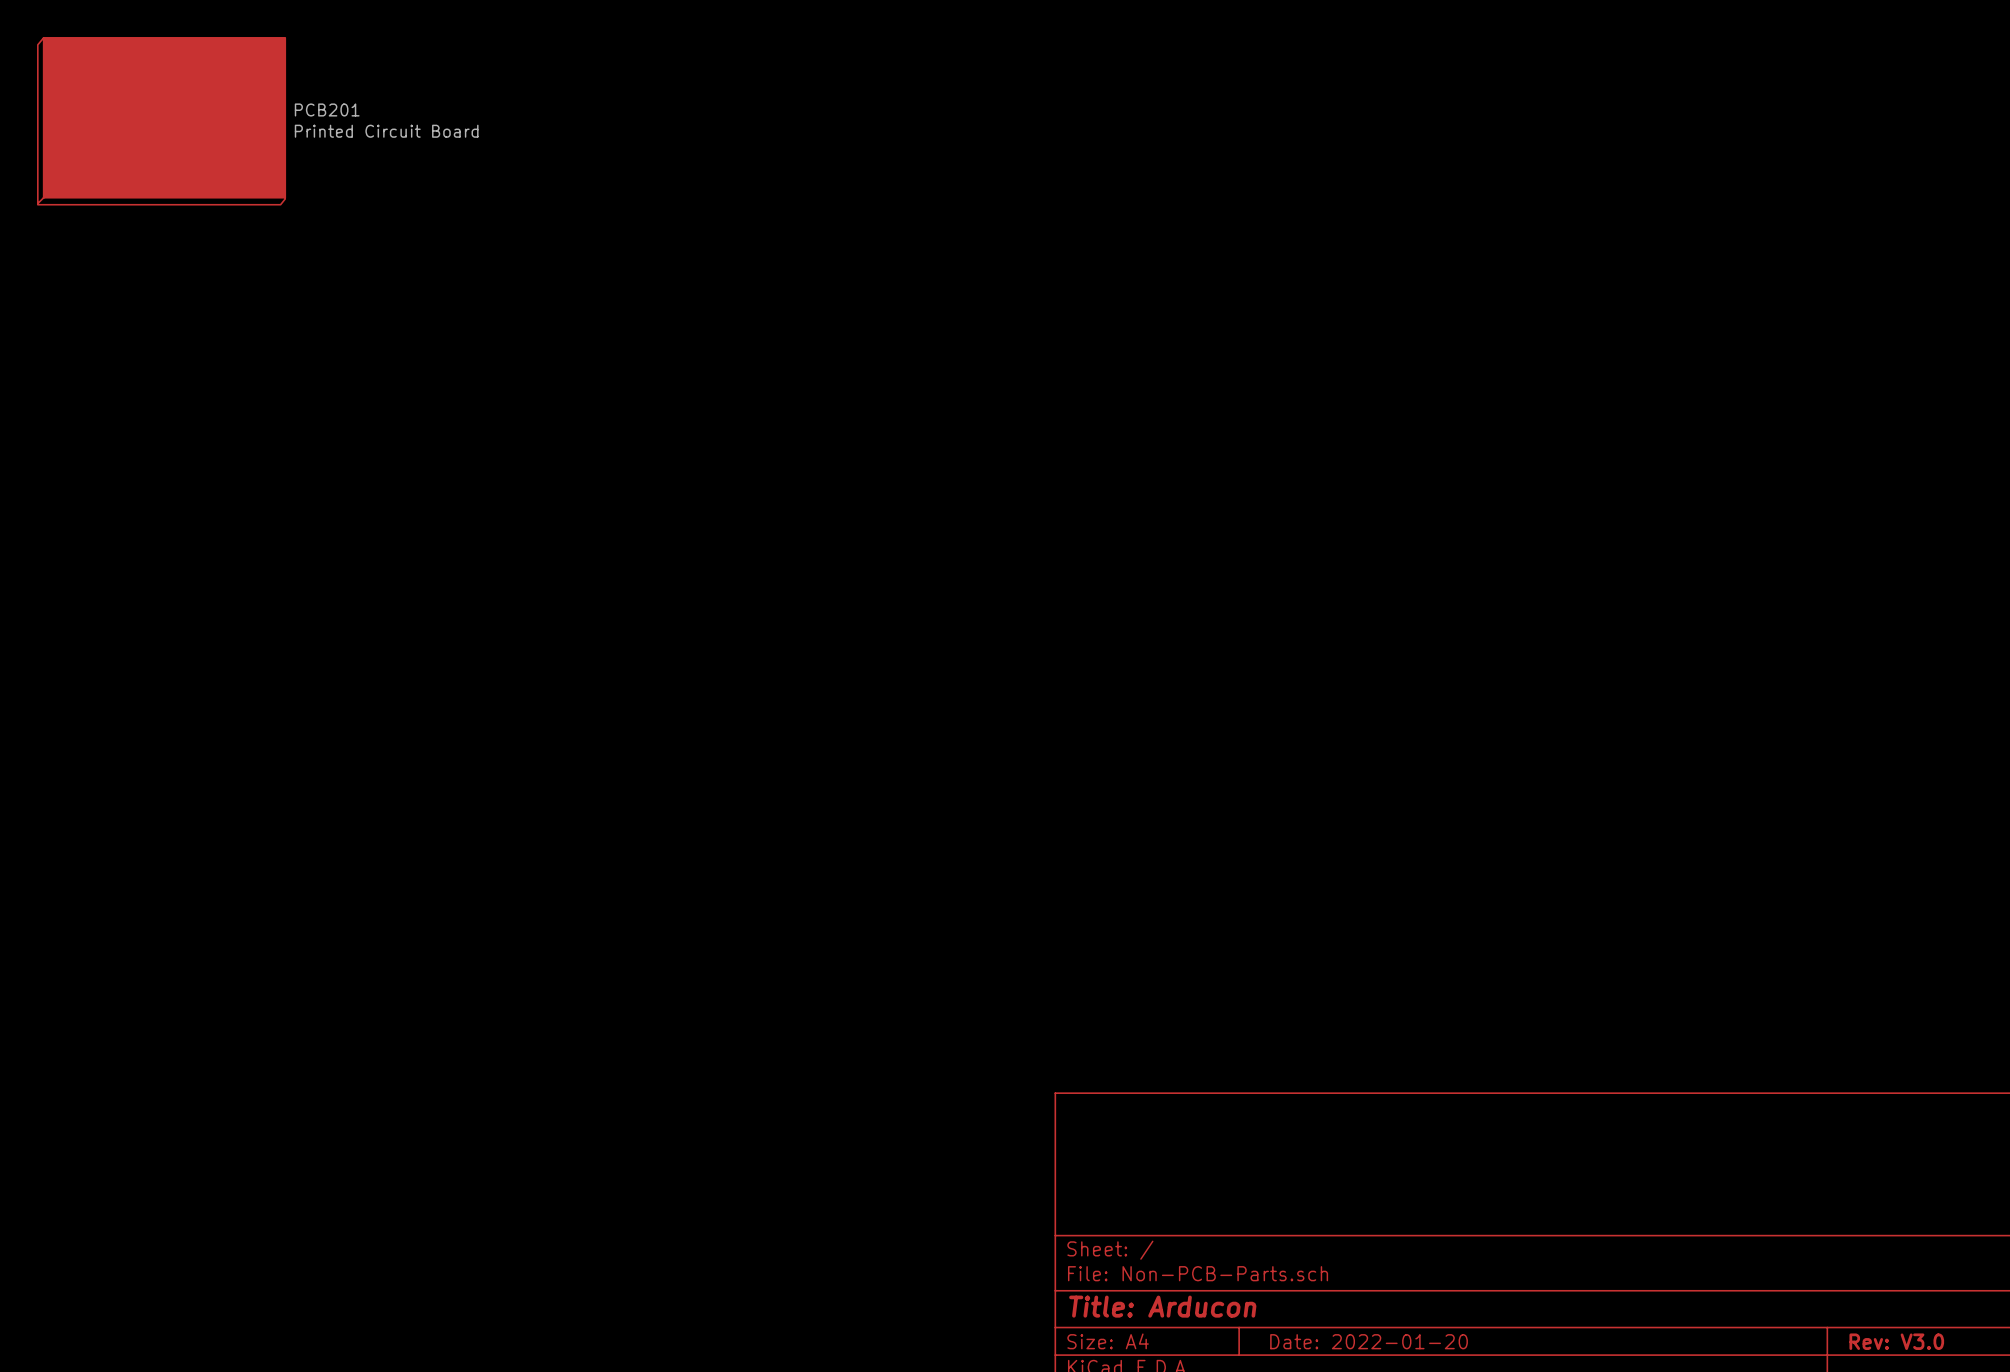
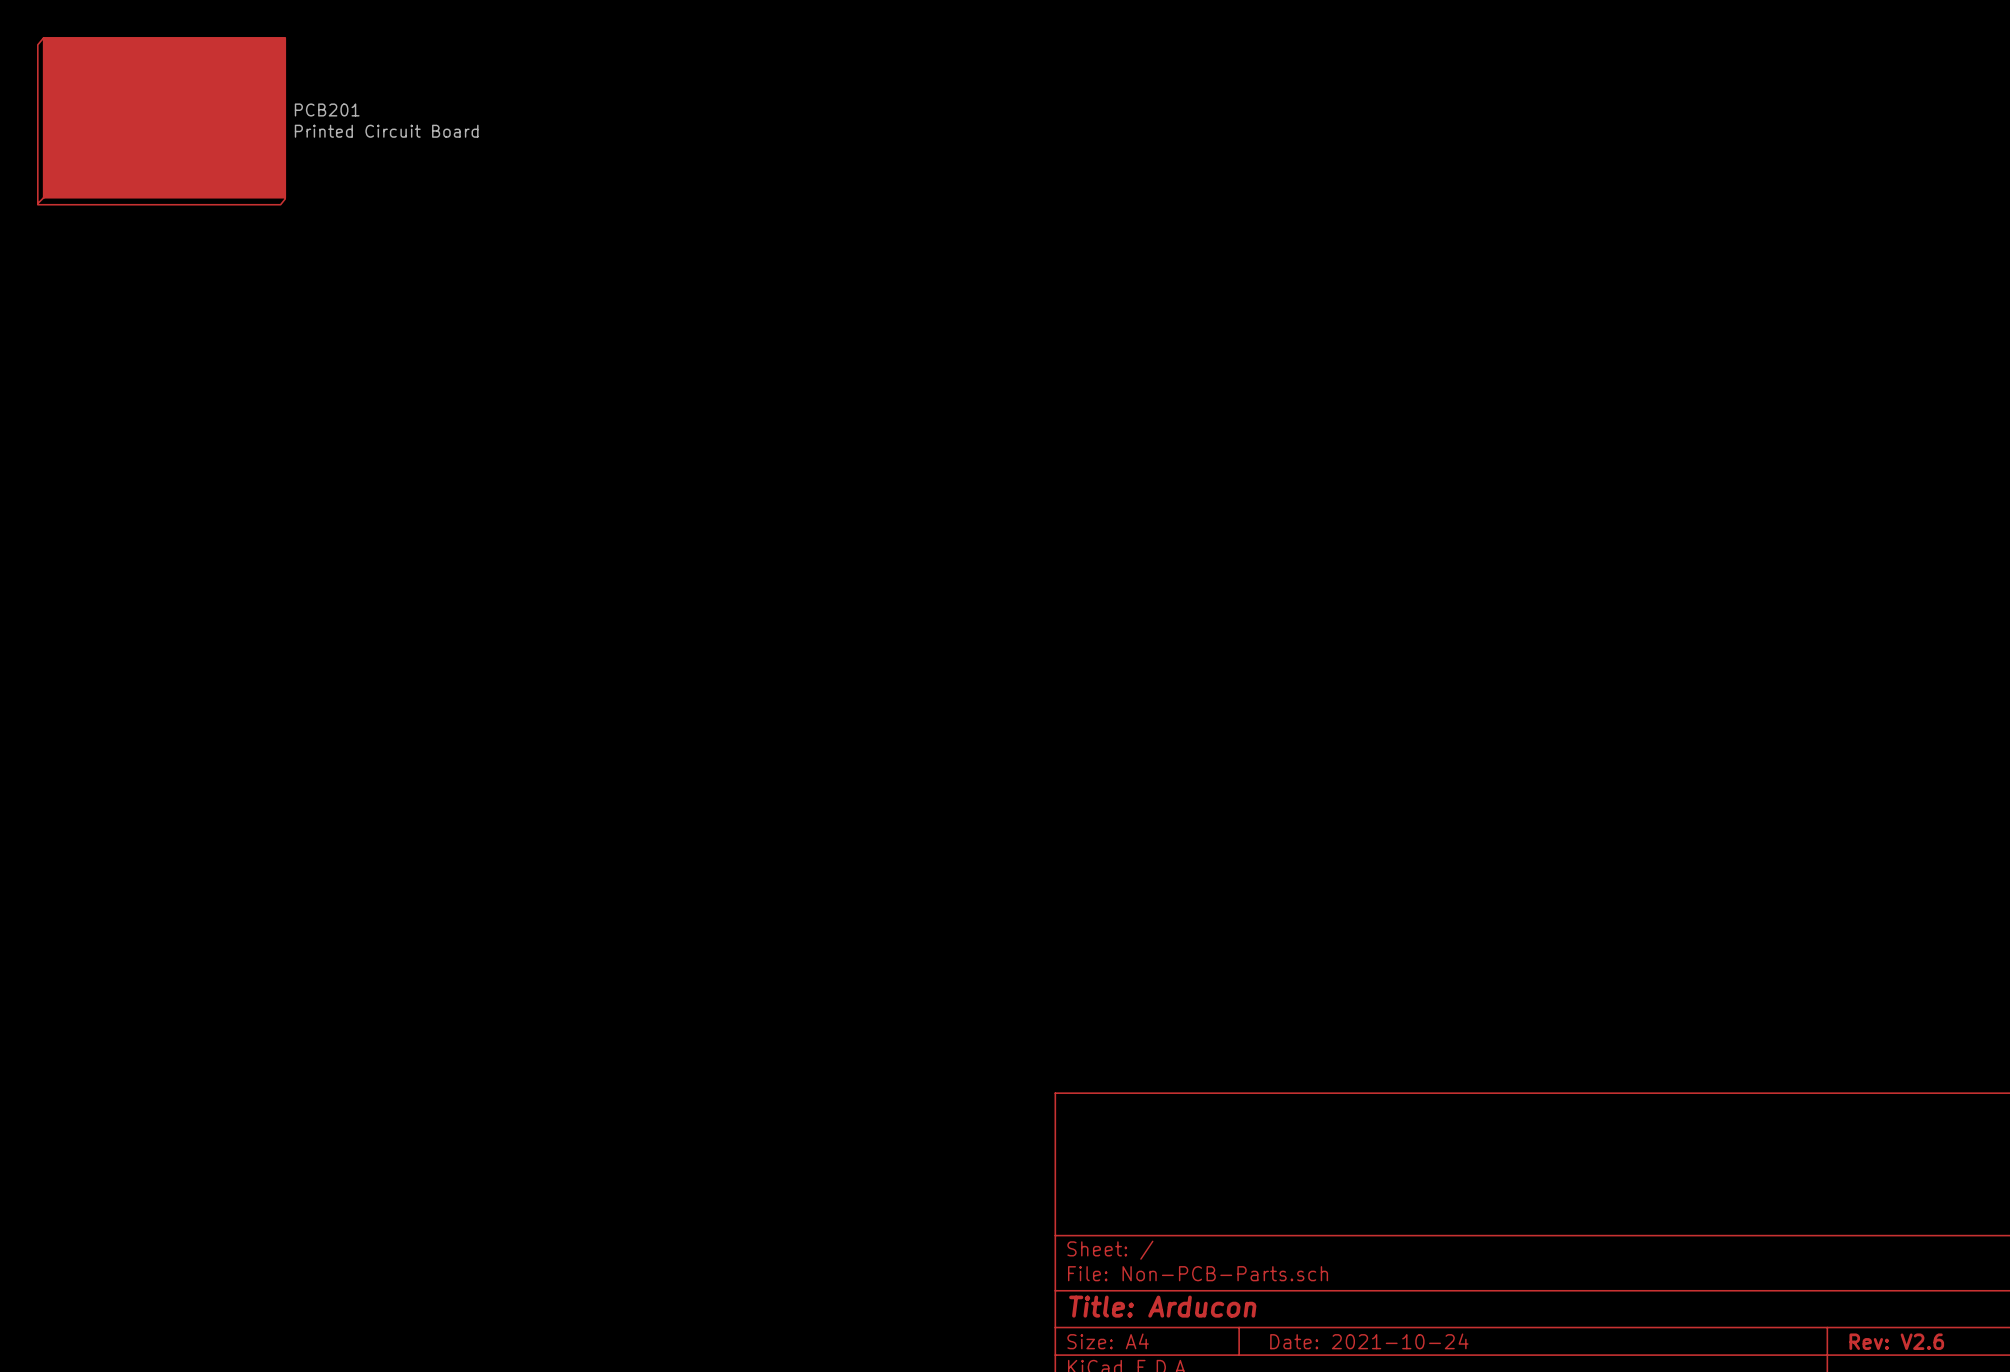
title block: Date: 2022-01-20 (1369, 1341) -> Date: 2021-10-24 (1369, 1341)
title block: Rev: V3.0 (1896, 1341) -> Rev: V2.6 (1896, 1341)

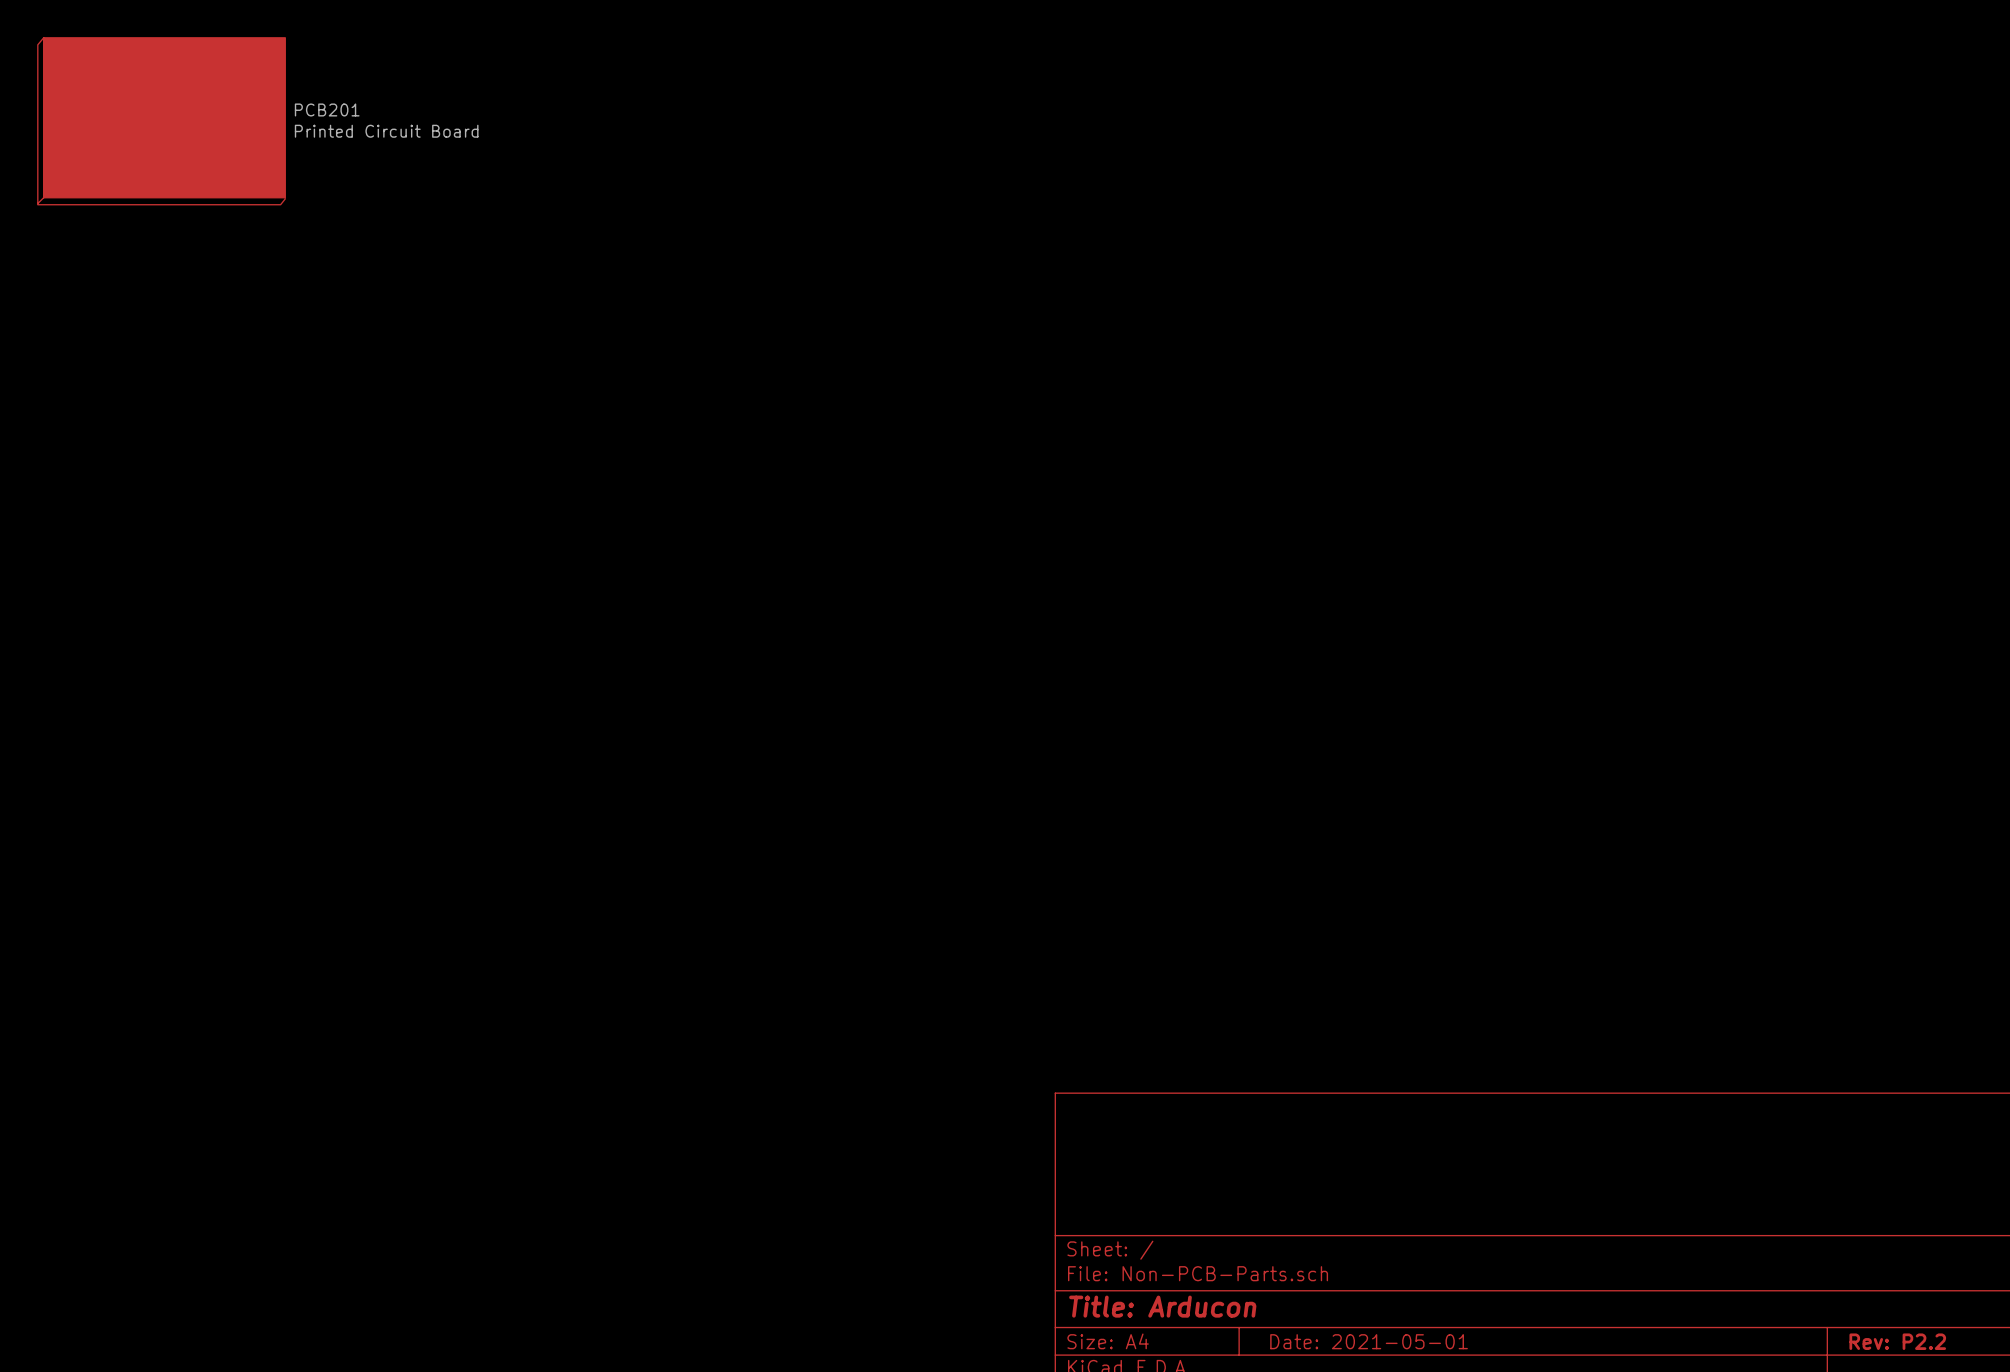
title block: Date: 2021-10-24 (1369, 1341) -> Date: 2021-05-01 (1369, 1341)
title block: Rev: V2.6 (1896, 1341) -> Rev: P2.2 (1897, 1341)

